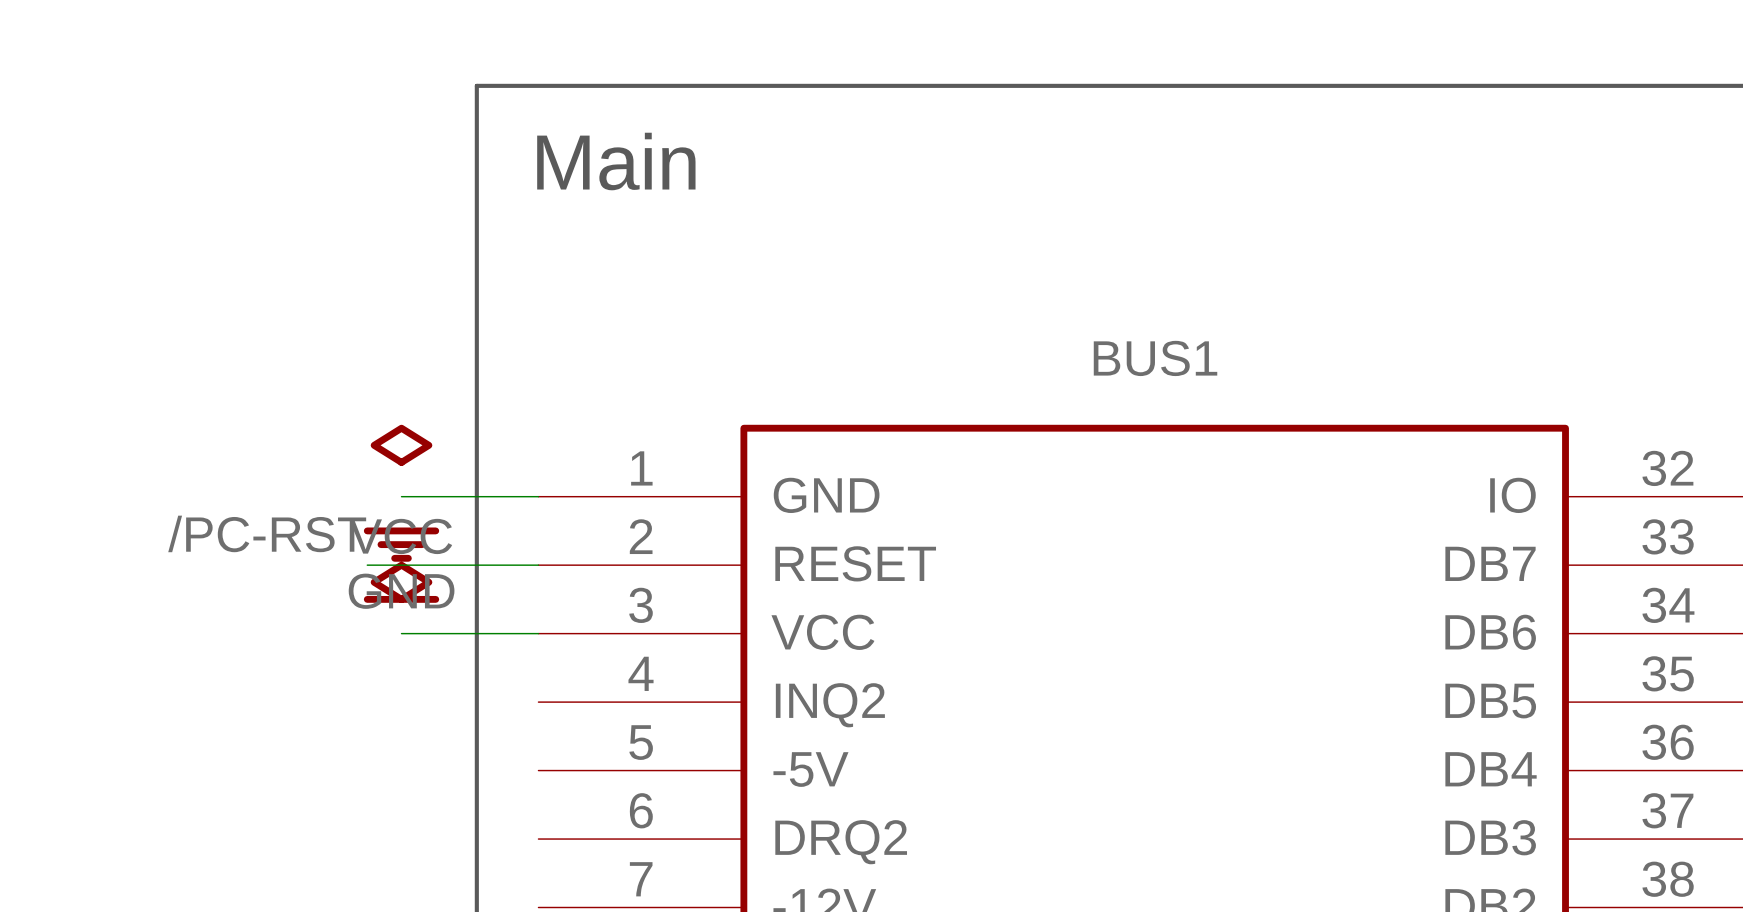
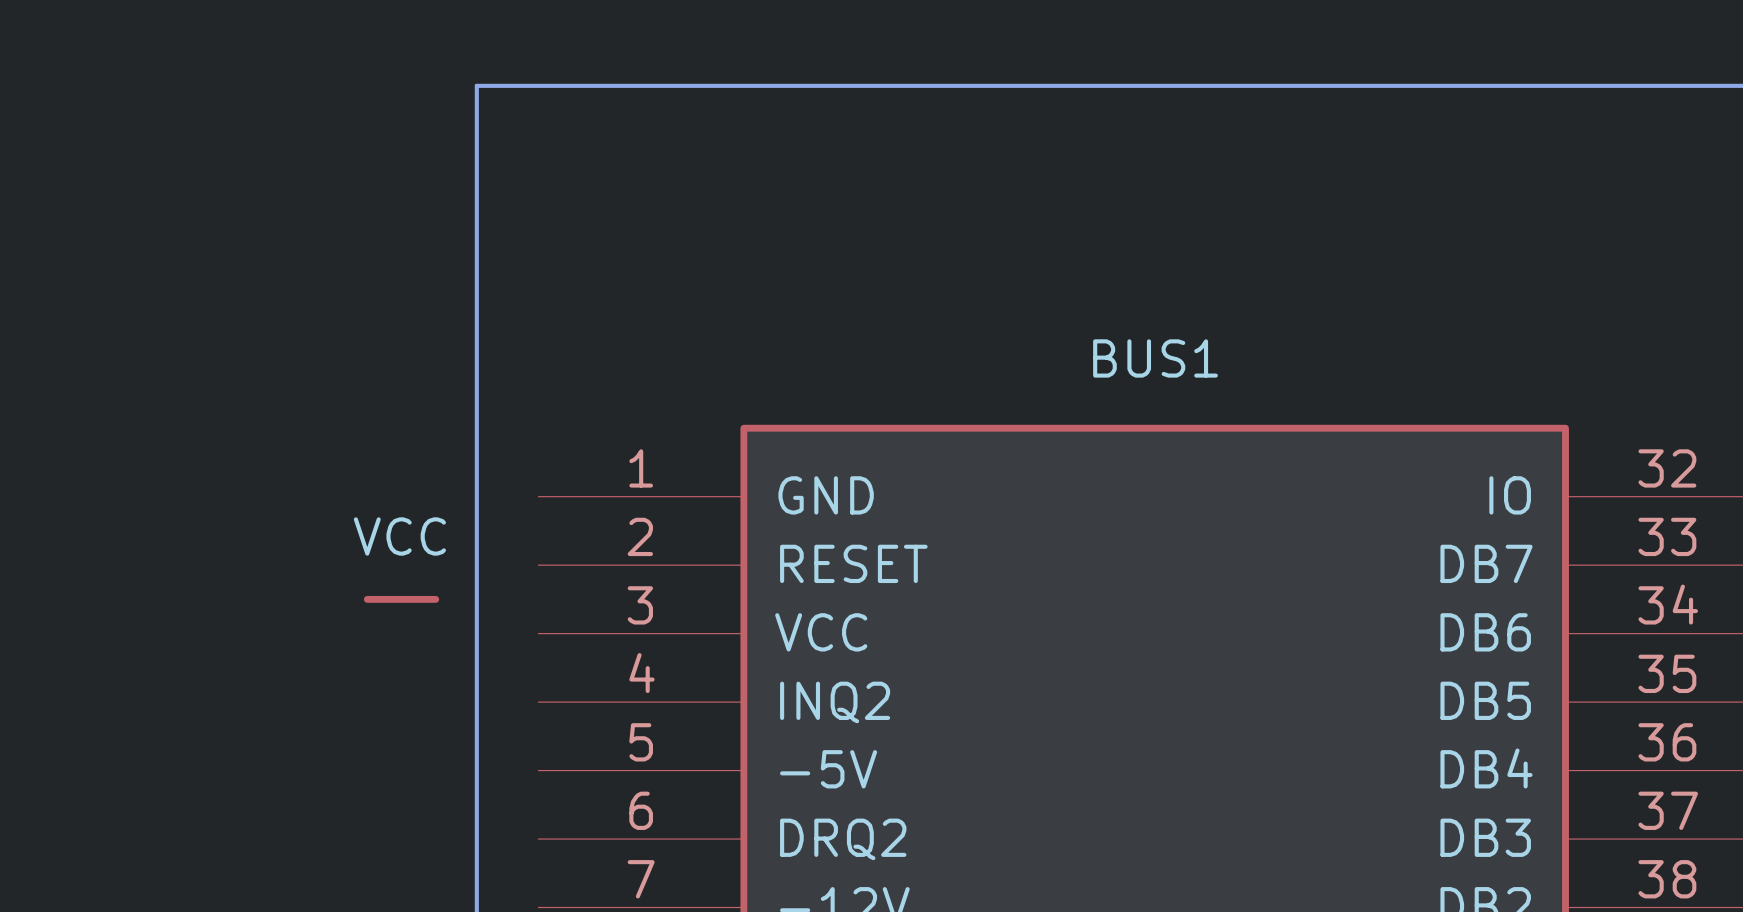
text: Main (616, 161) -> none
power symbol: (401, 445) -> none
wire: (401, 496) (538, 496) -> none
label: /PC-RST (267, 533) -> none
power symbol: GND (401, 544) -> none
wire: (367, 565) (538, 565) -> none
power symbol: (401, 582) -> none
wire: (401, 633) (538, 633) -> none

